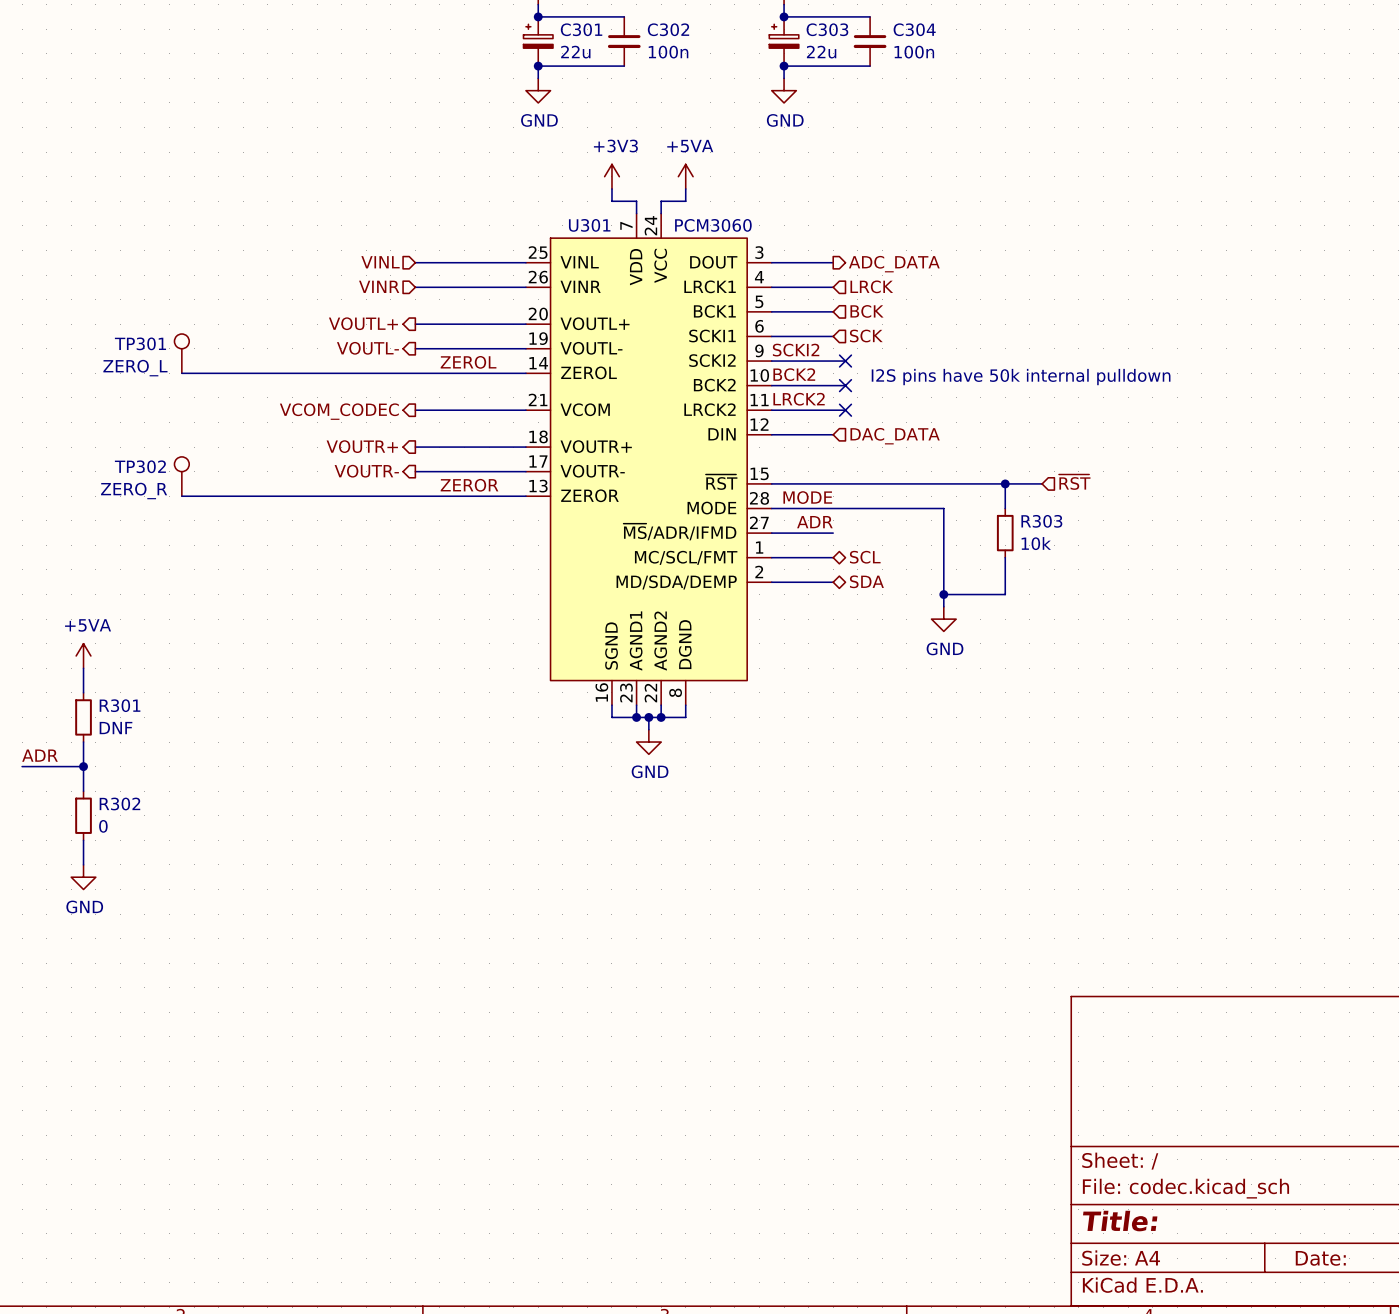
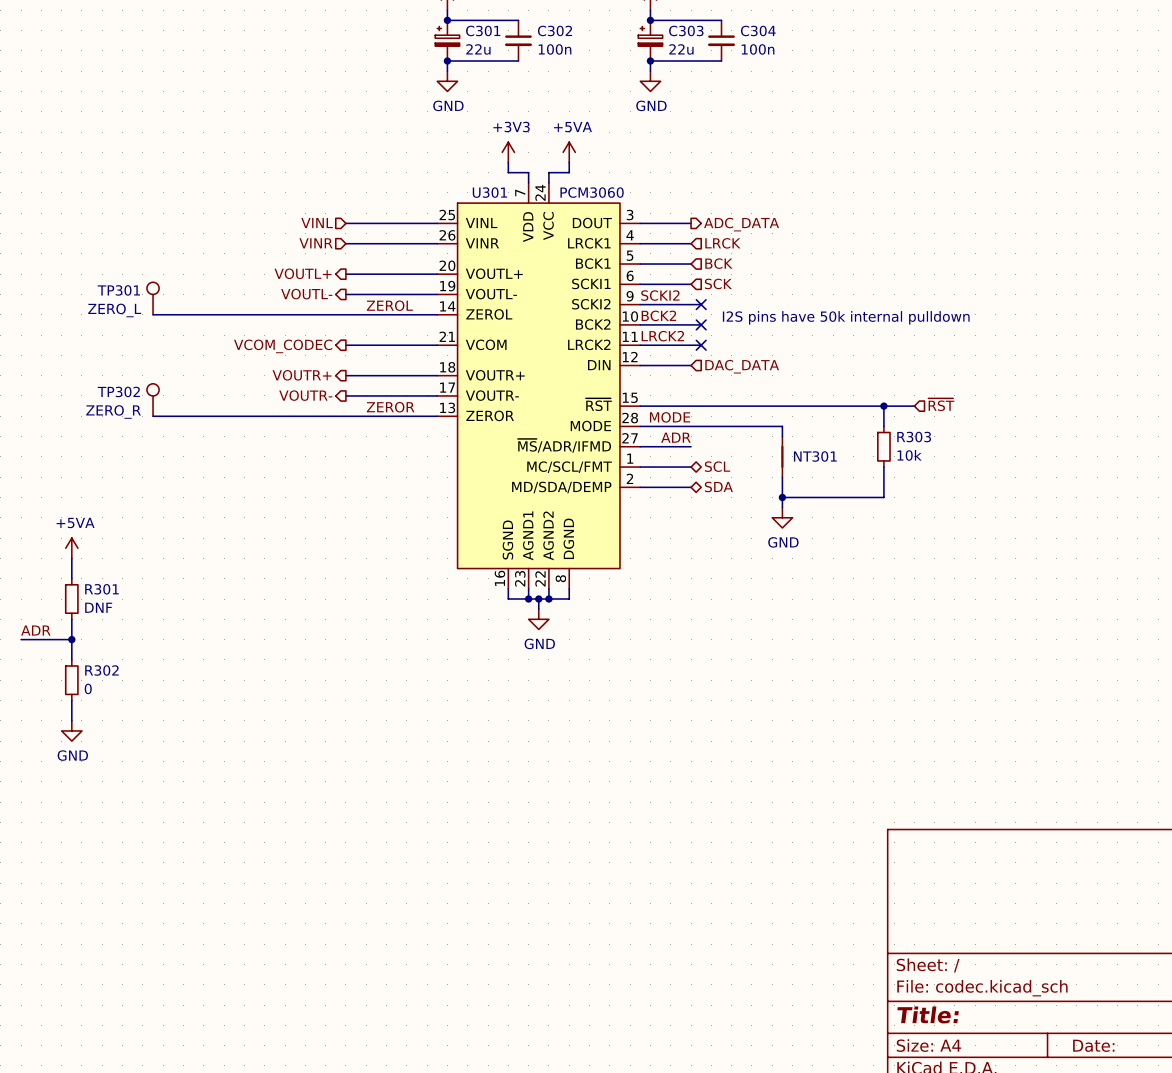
hierarchical label position: ~{RST} (1074, 482) -> ~{RST} (941, 404)
wire: (1005, 483) (1005, 508) -> (883, 406) (883, 426)
junction: (1005, 483) -> none
wire: none -> (863, 406) (914, 406)
junction: none -> (883, 406)
R303 position: (1005, 533) -> (883, 446)
NT301: none -> (782, 456)
wire: (1005, 557) (1005, 594) -> (883, 467) (883, 497) (833, 497)

